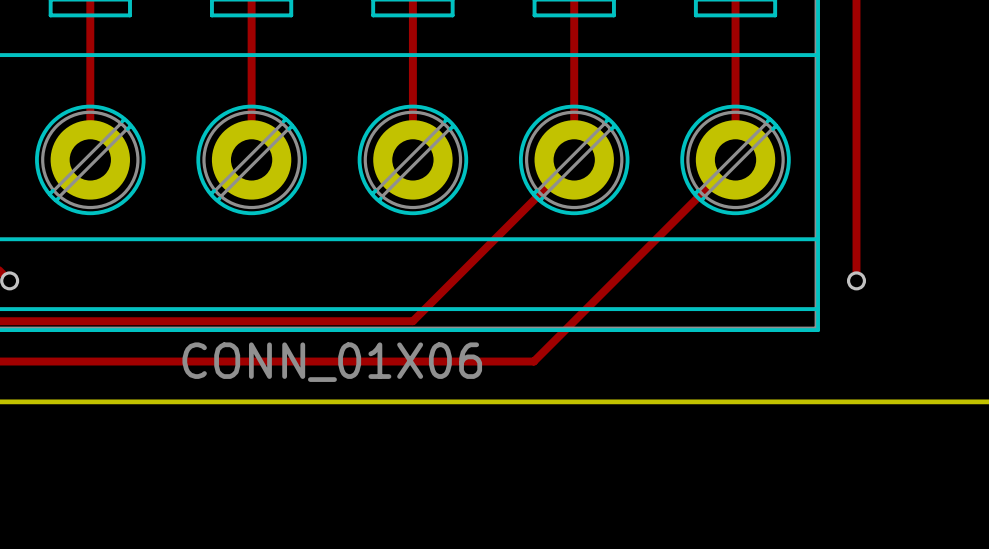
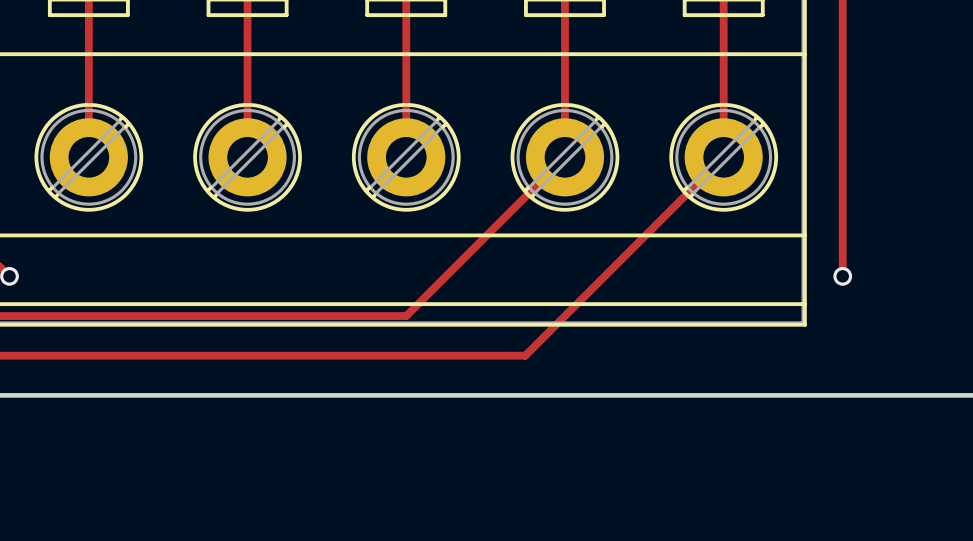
part value: CONN_01X06 (332, 362) -> none

